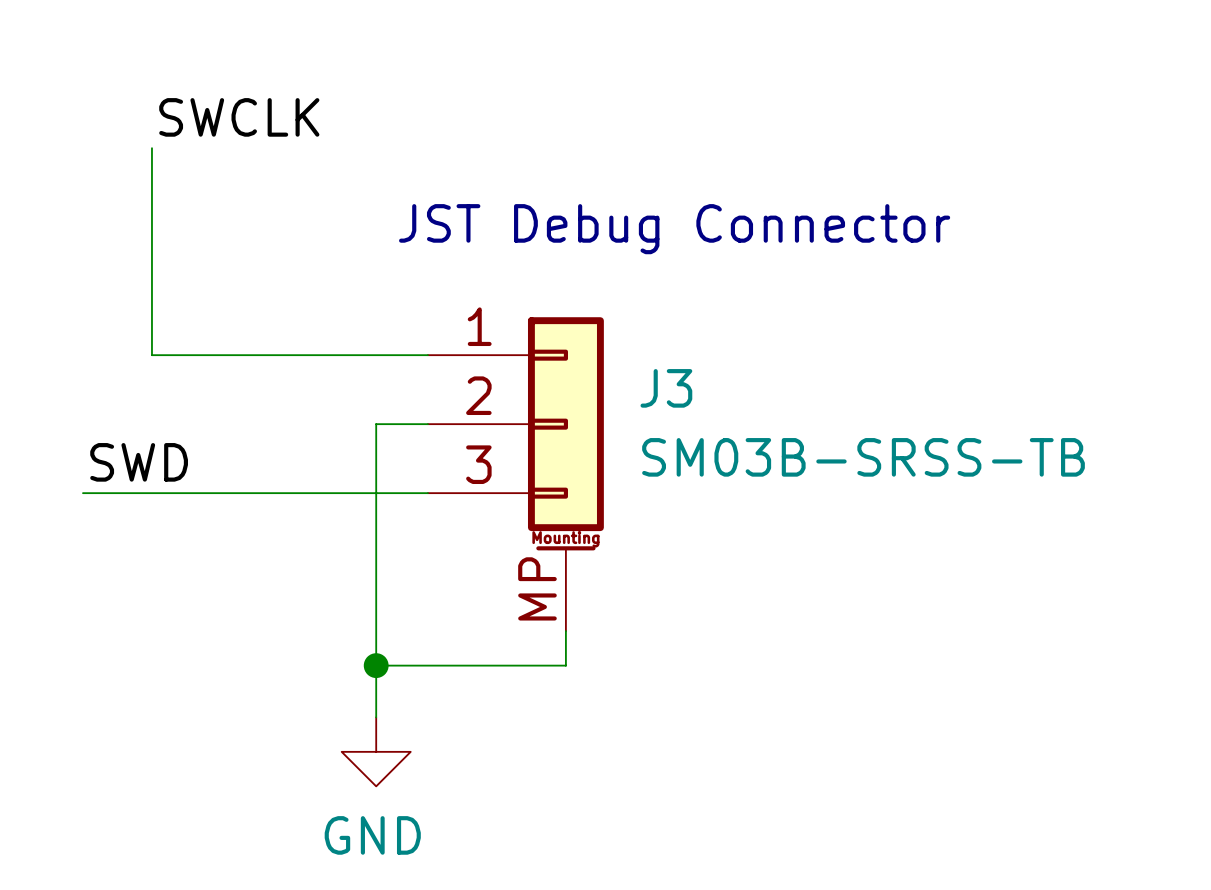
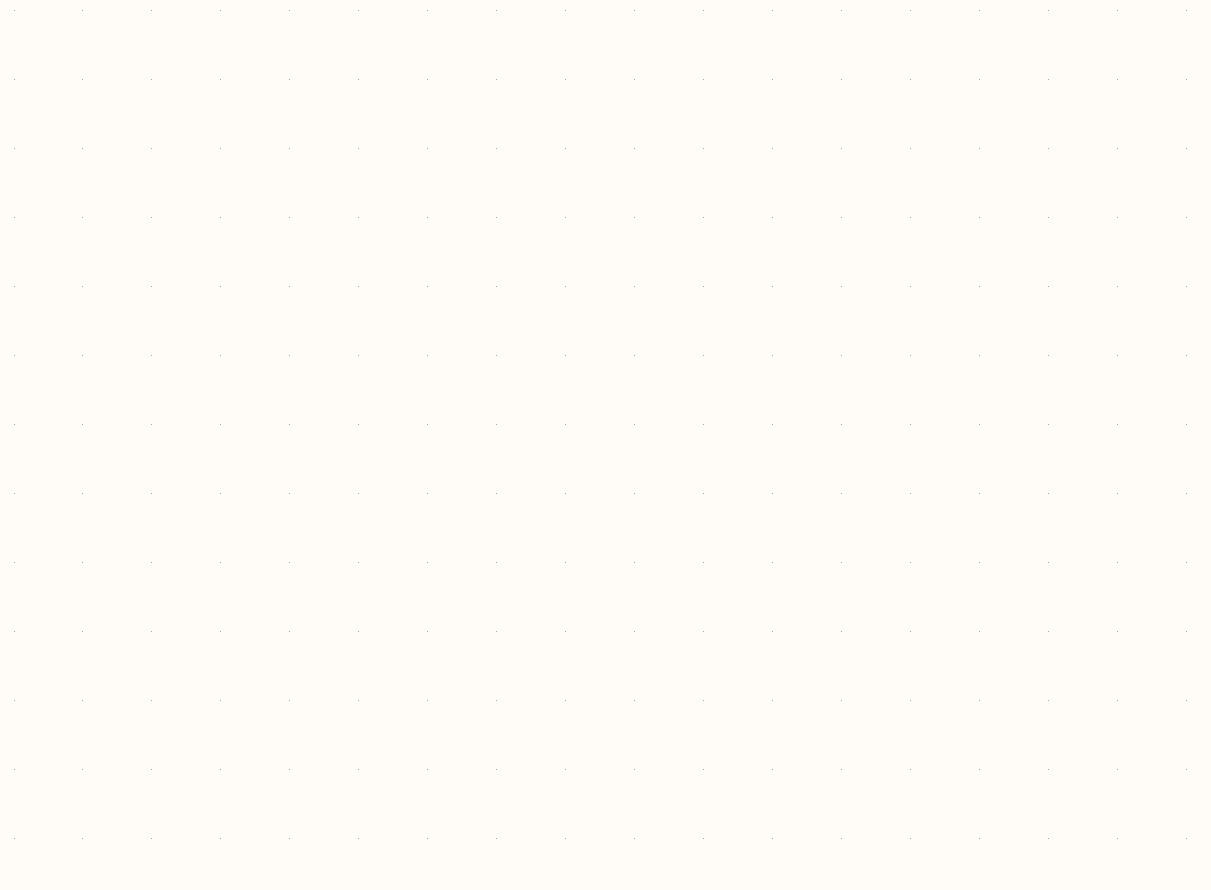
label: SWCLK (239, 117) -> none
wire: (151, 148) (151, 355) (427, 355) -> none
text: JST Debug Connector (674, 229) -> none
wire: (427, 424) (376, 424) (376, 717) -> none
label: SWD (139, 462) -> none
J3: SM03B-SRSS-TB (515, 474) -> none
wire: (82, 493) (427, 493) -> none
wire: (565, 631) (565, 665) (376, 665) -> none
junction: (376, 665) -> none
power symbol: GND (376, 751) -> none

